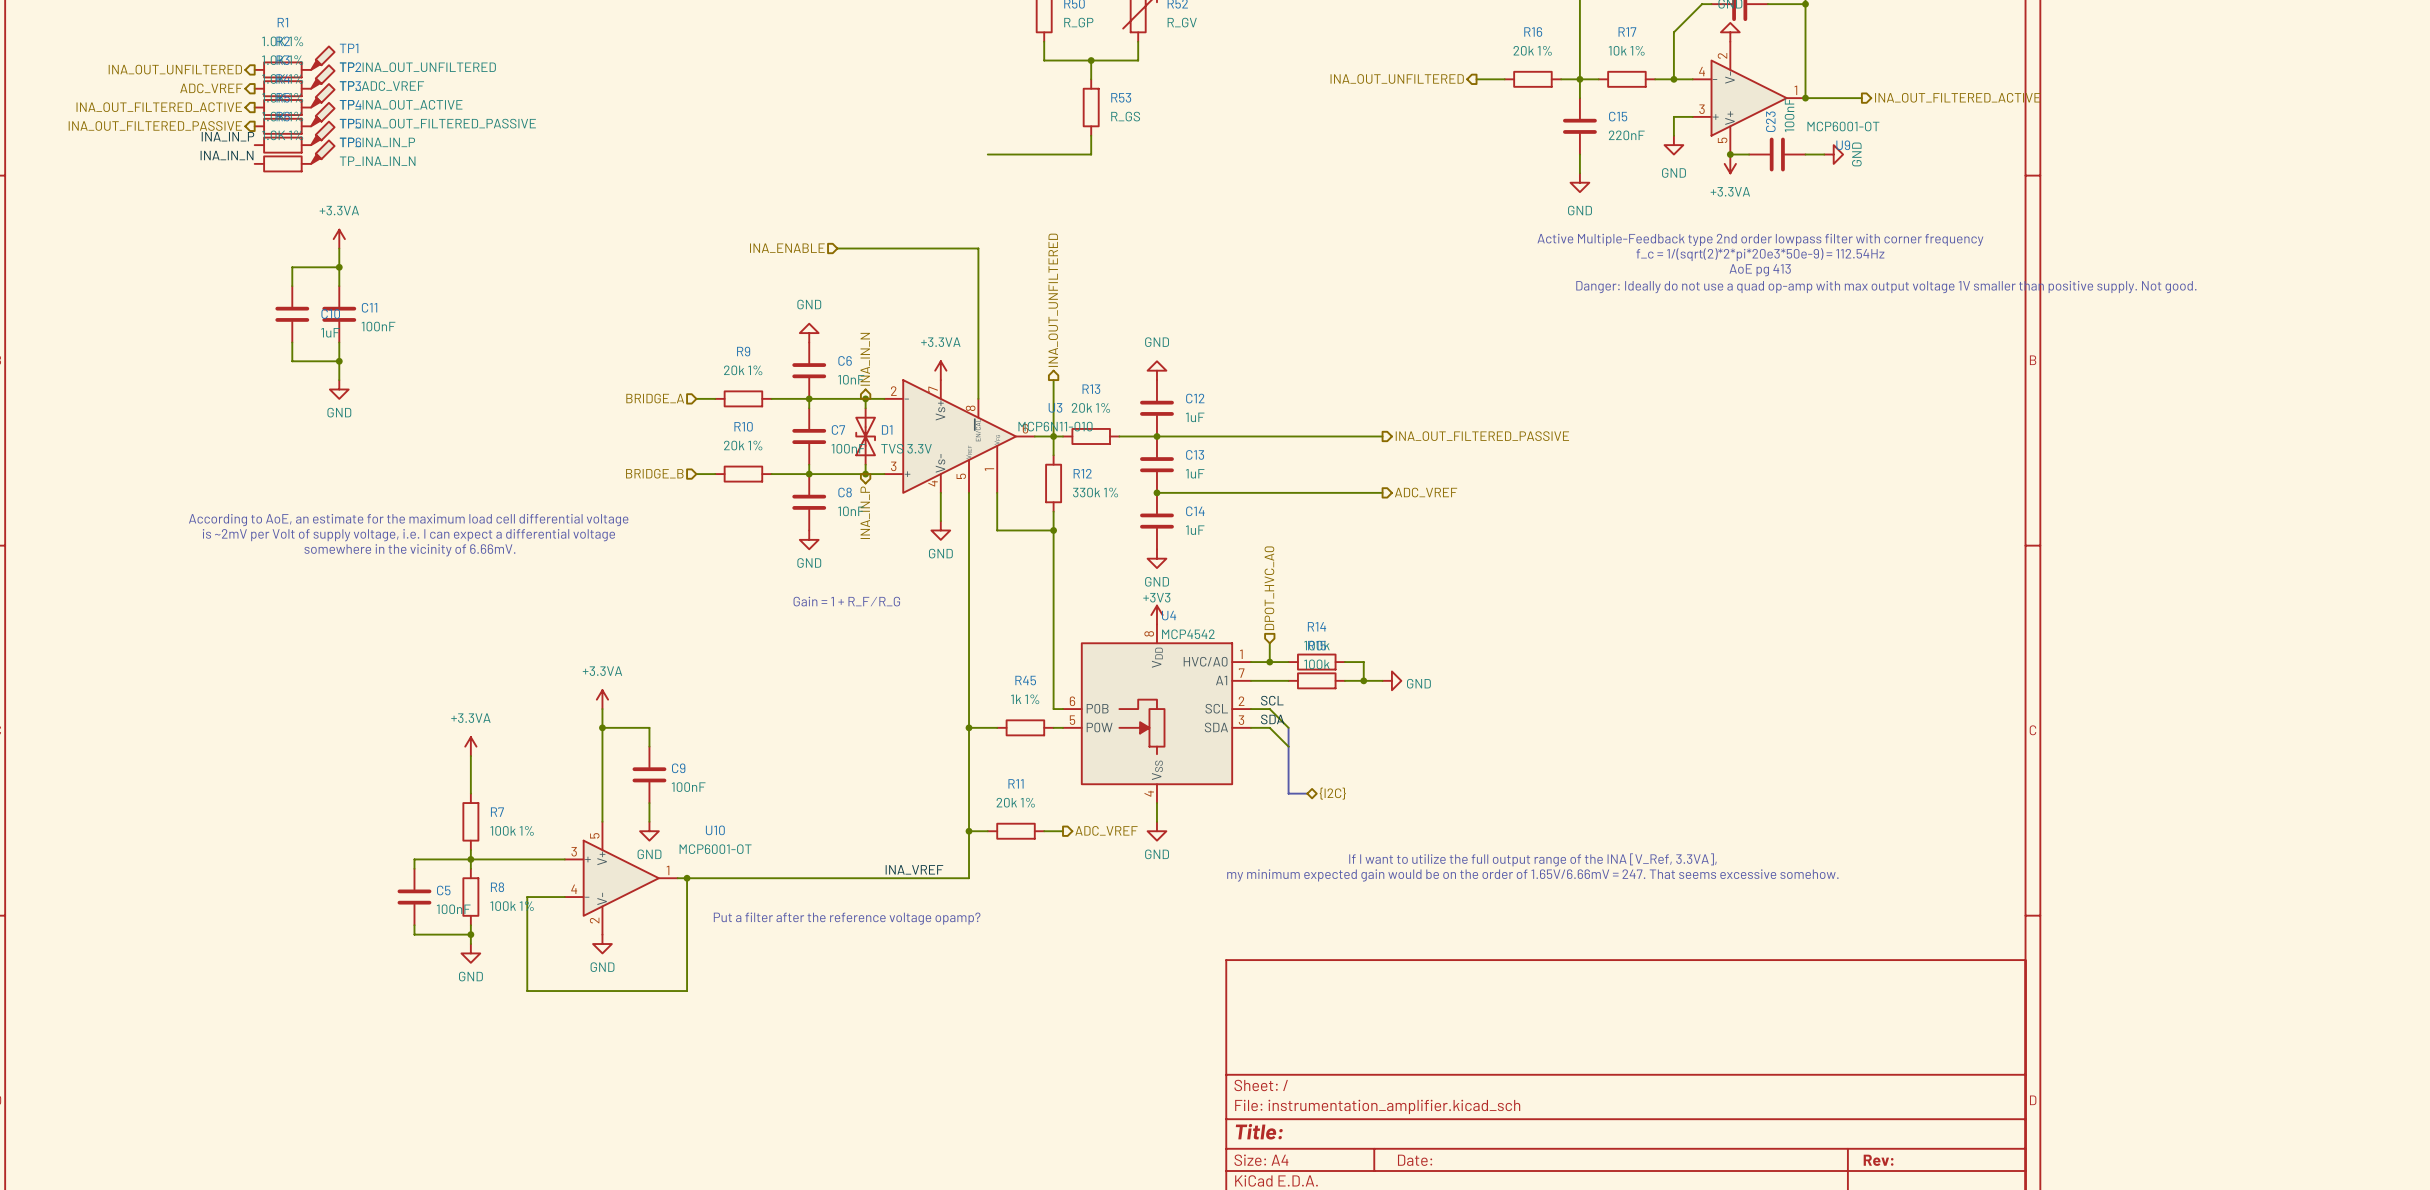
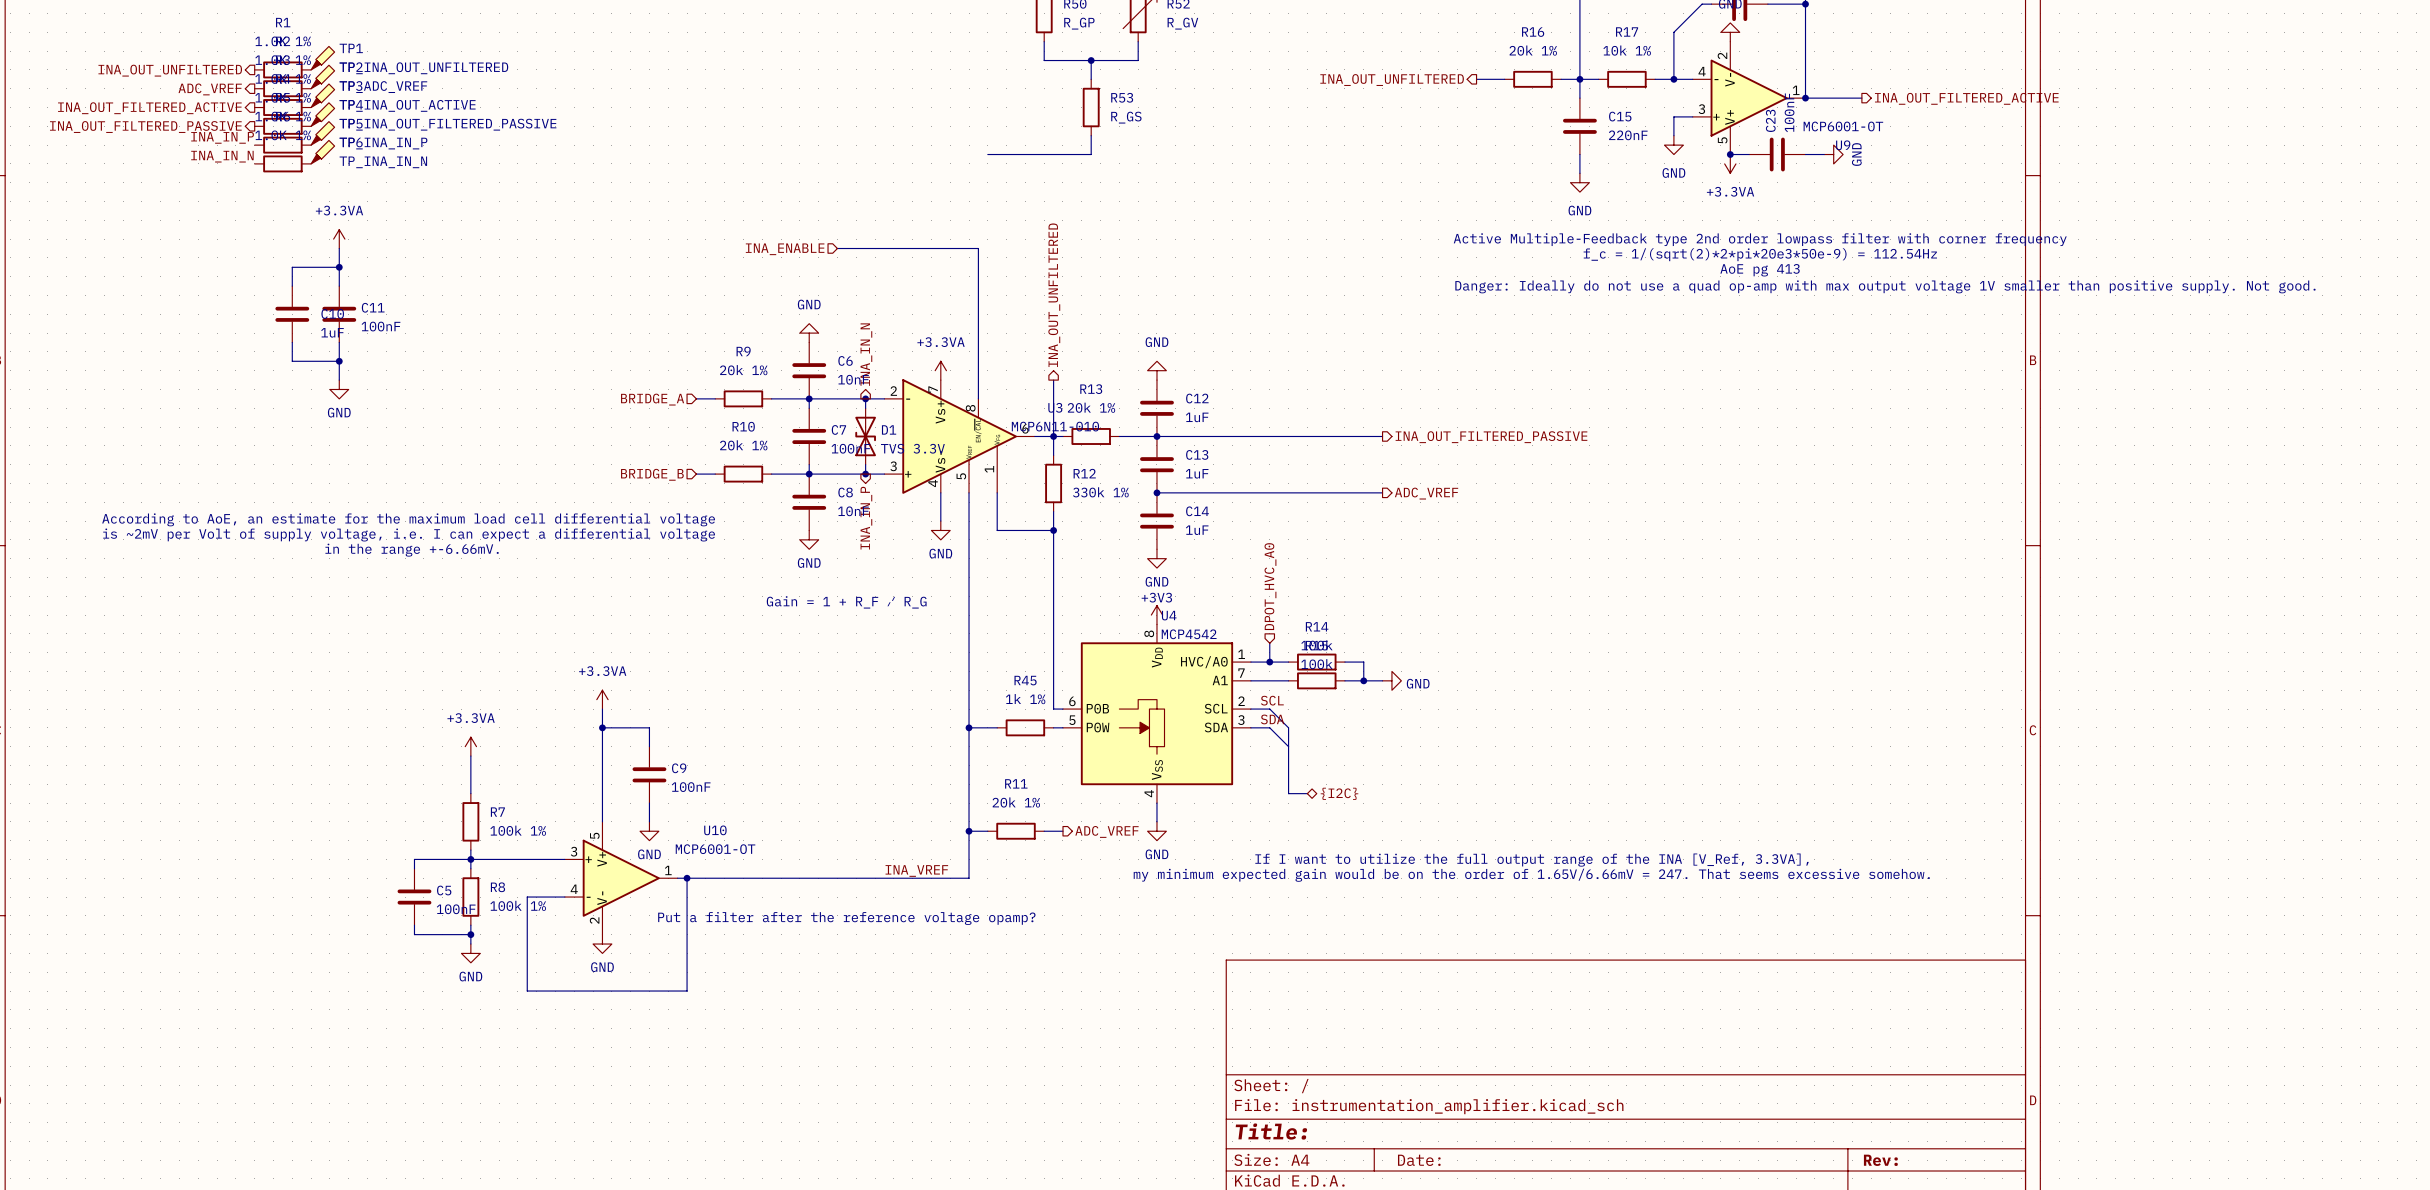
text: somewhere in the vicinity of 6.66mV. (409, 550) -> in the range +-6.66mV. (412, 550)

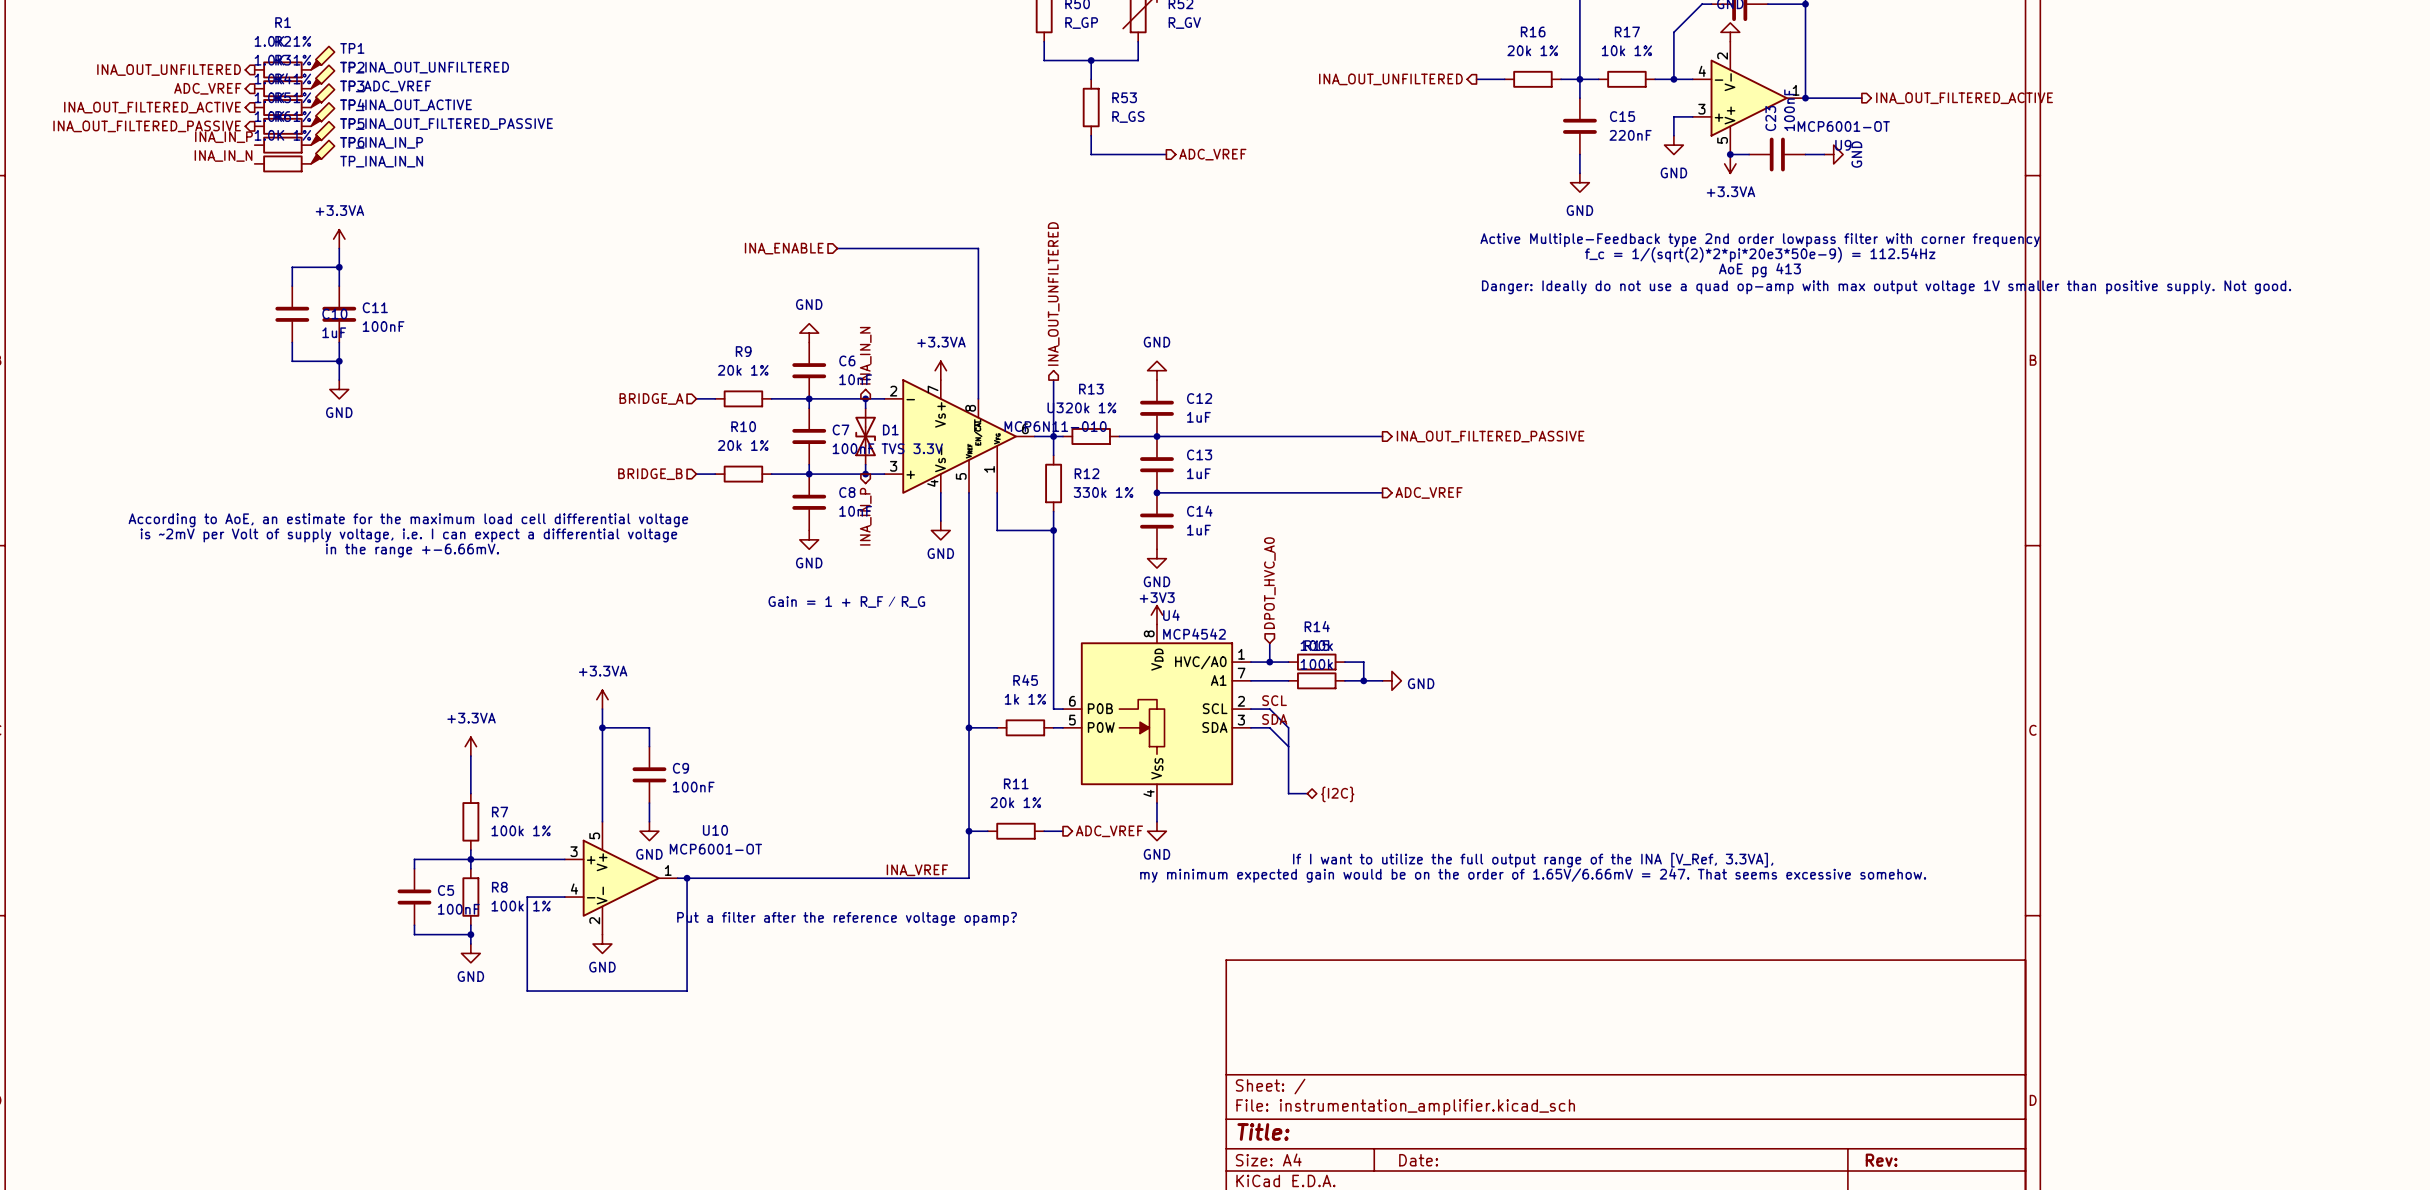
wire: (987, 154) (1091, 154) -> (1166, 154) (1091, 154)
hierarchical label: none -> ADC_VREF (1212, 154)

